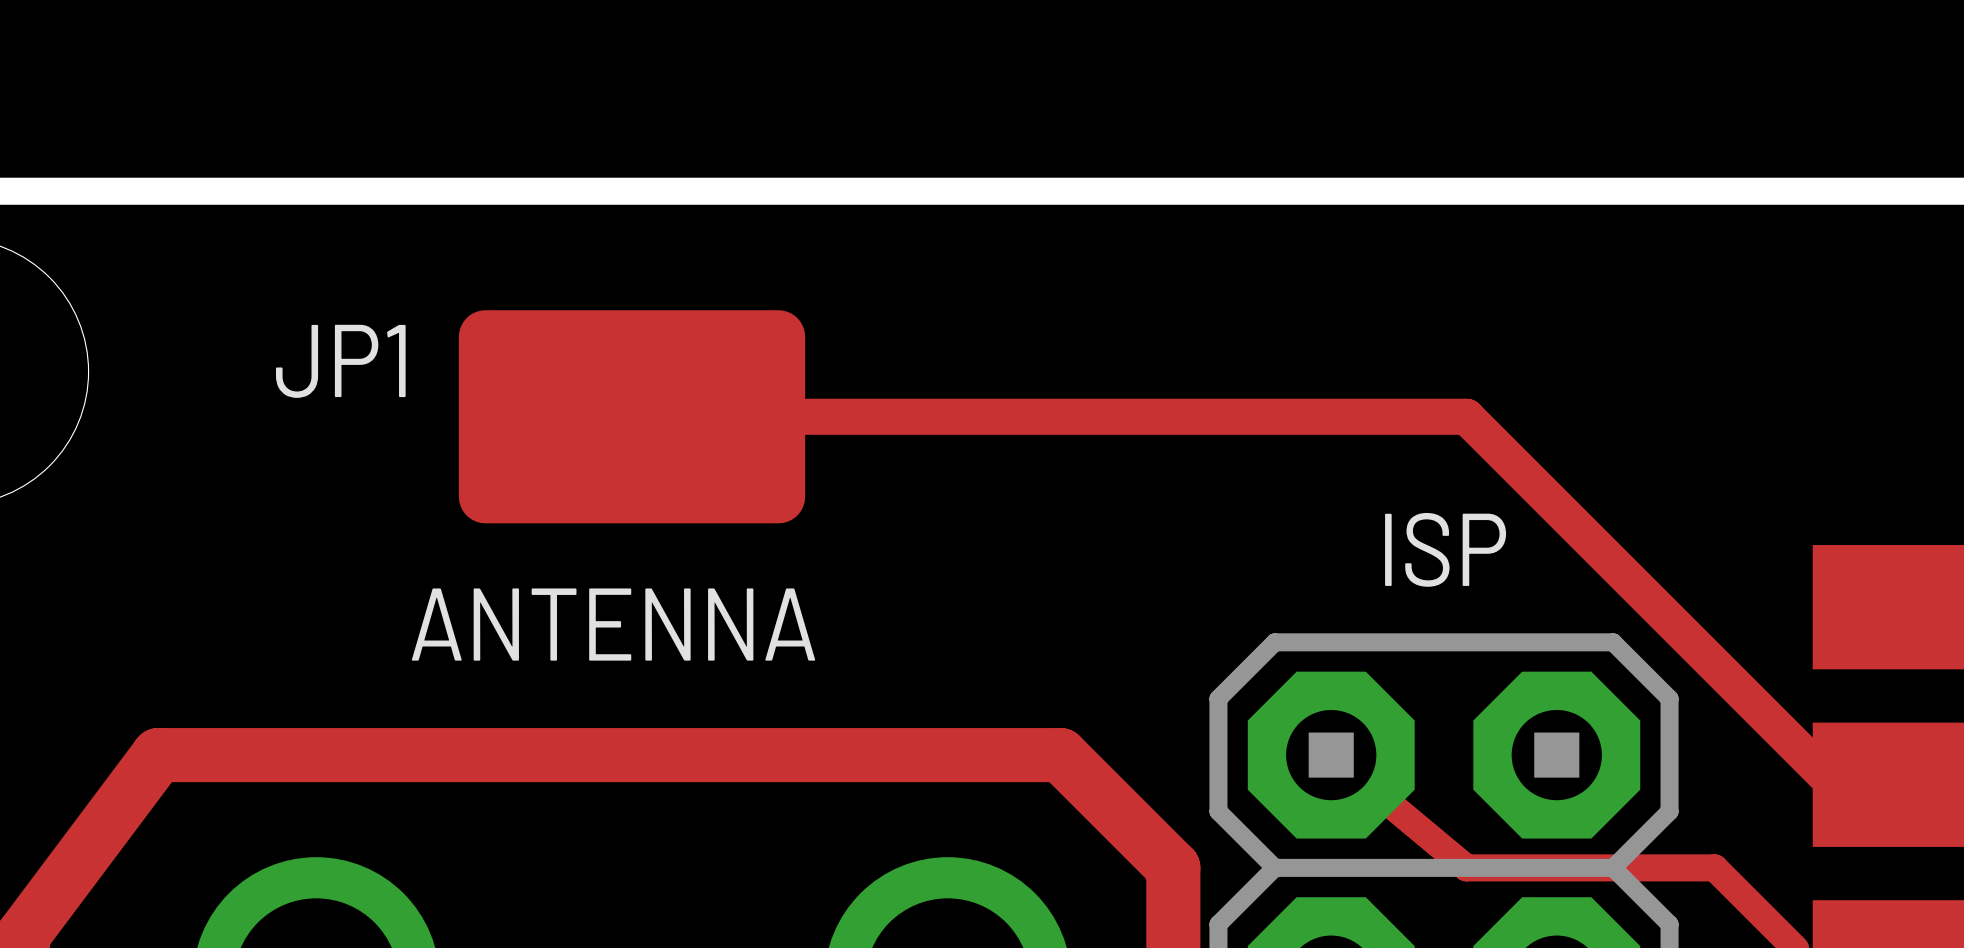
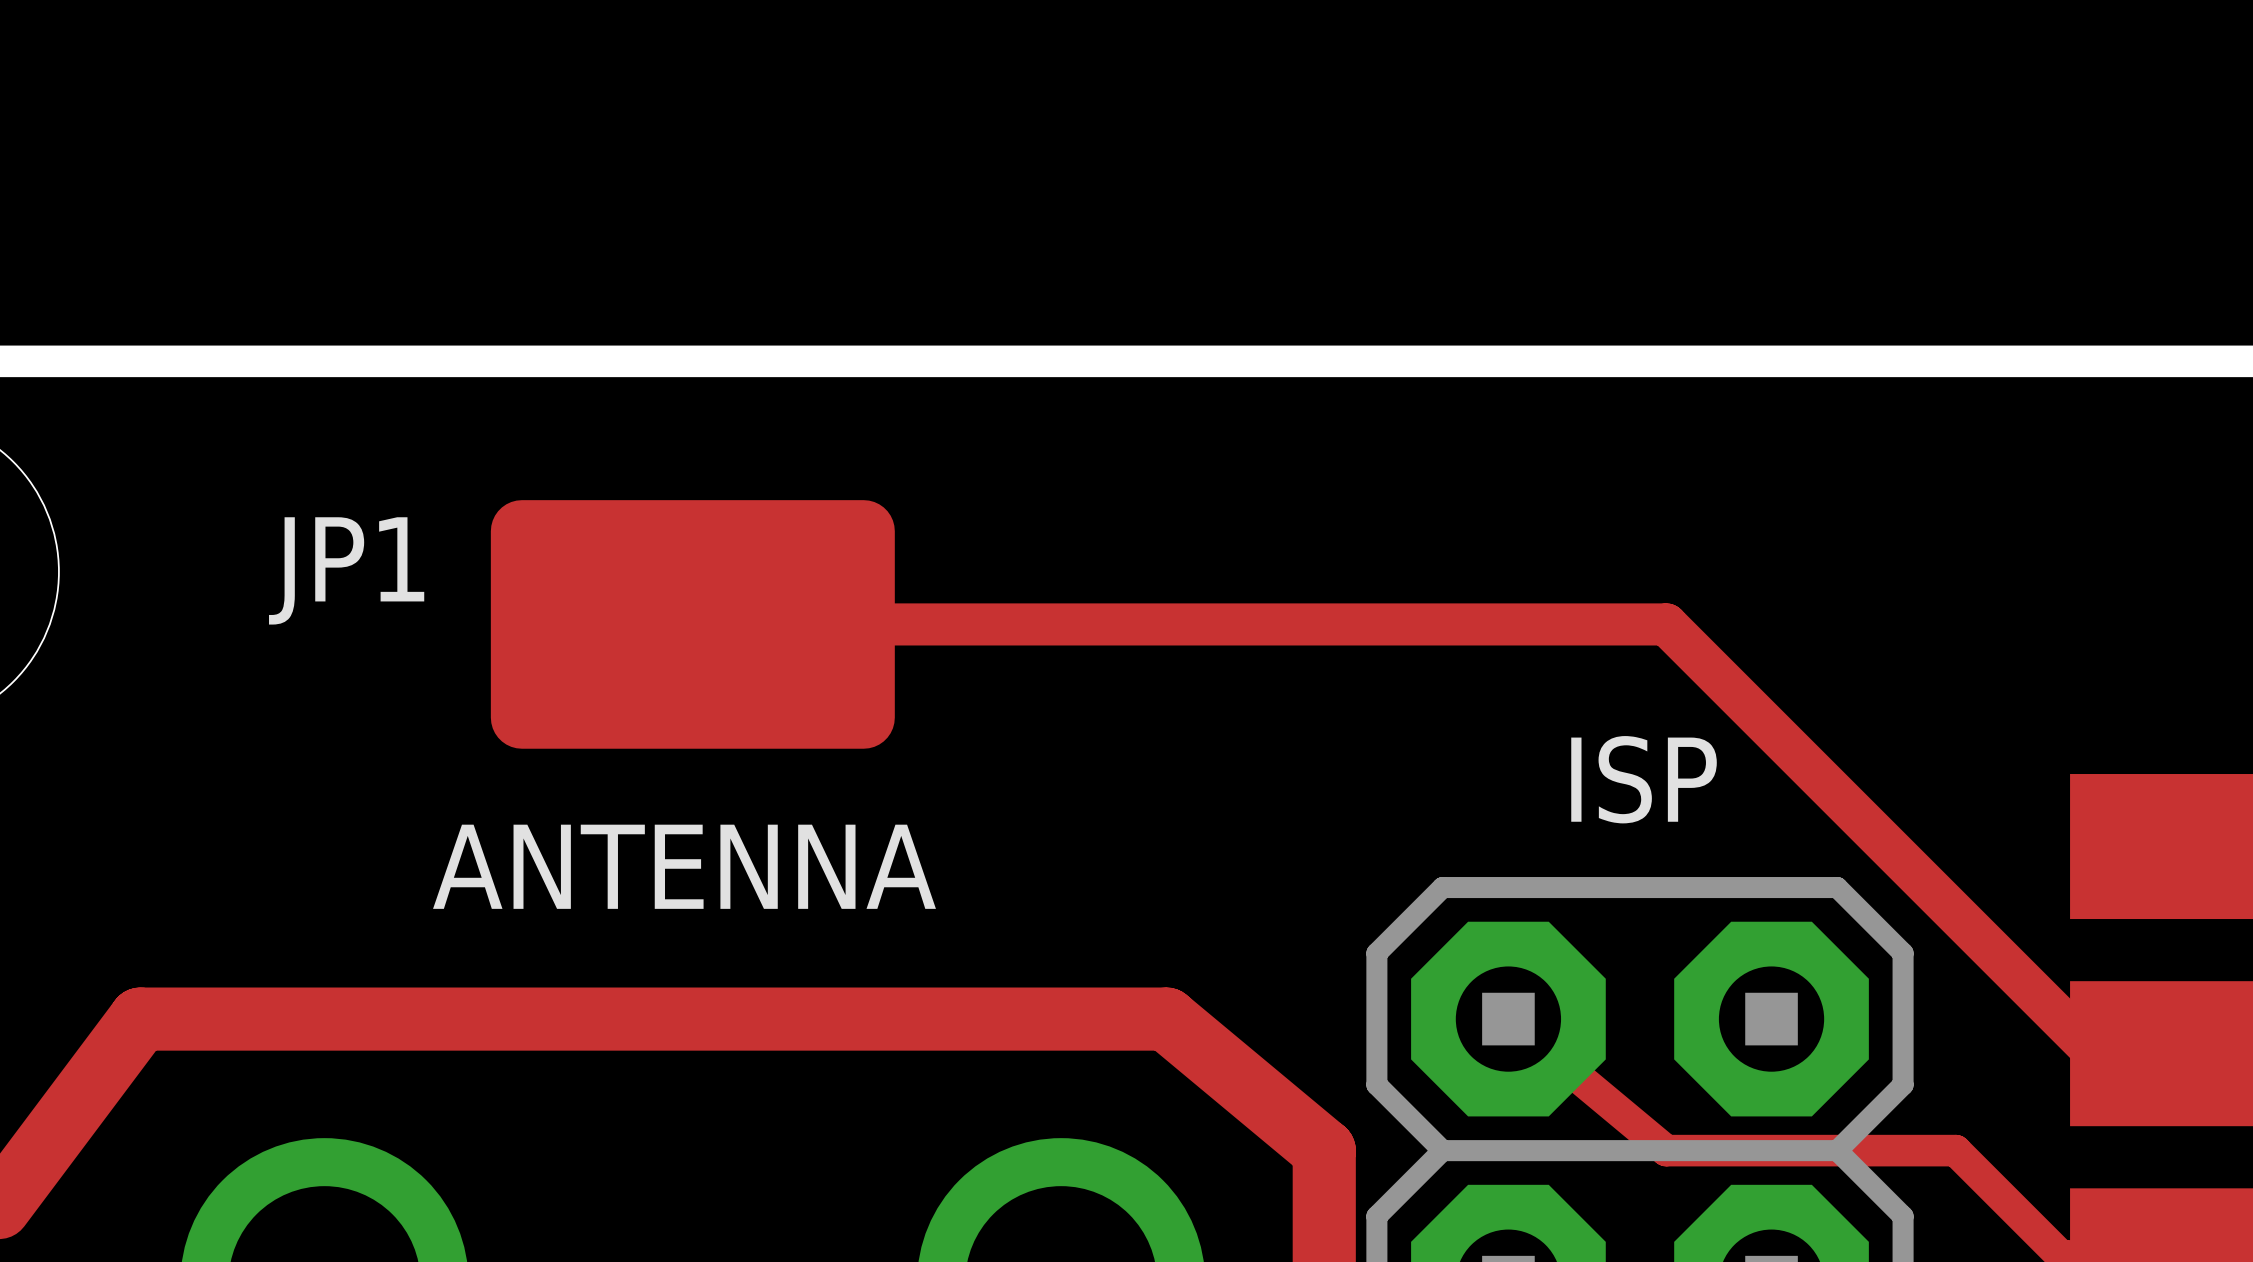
track: (1038, 755) (1060, 755) (1173, 867) -> (1166, 1019) (1324, 1150)

